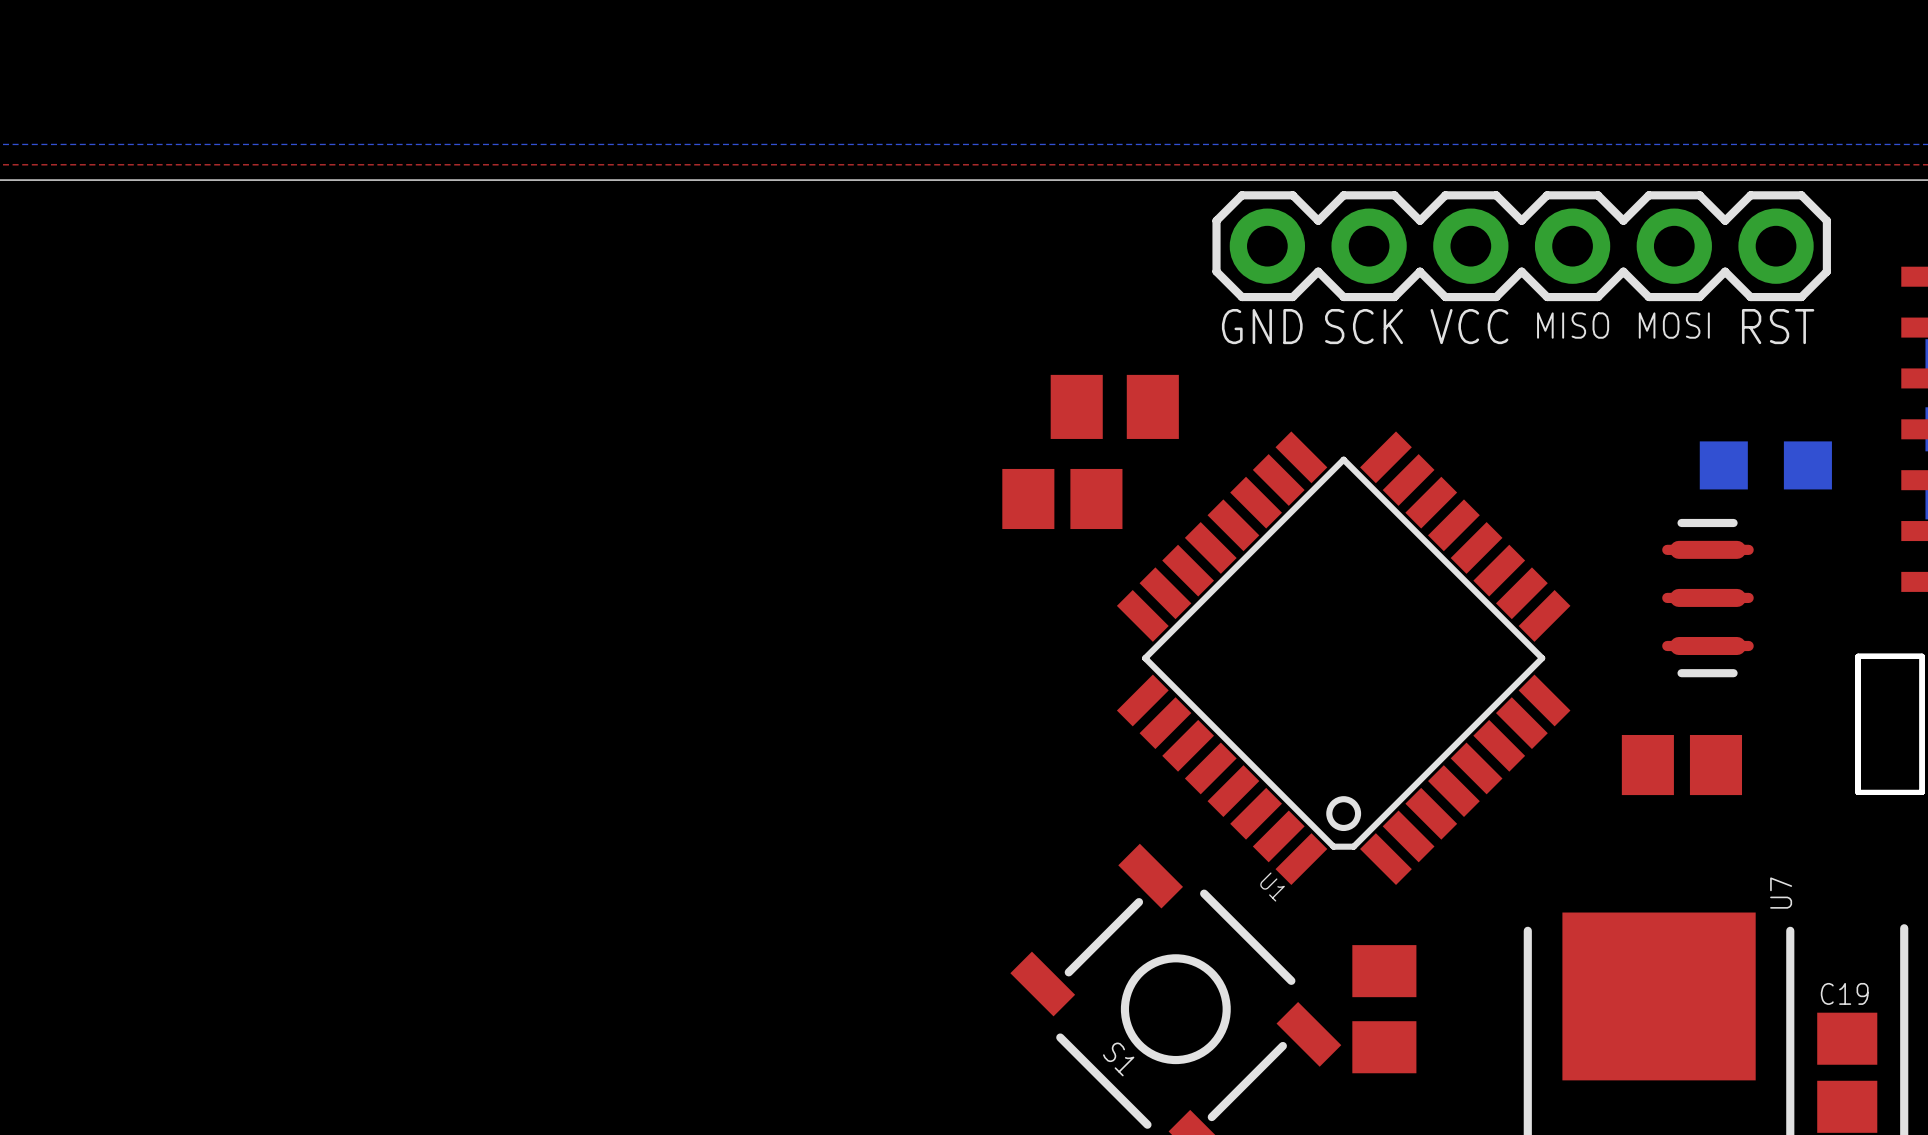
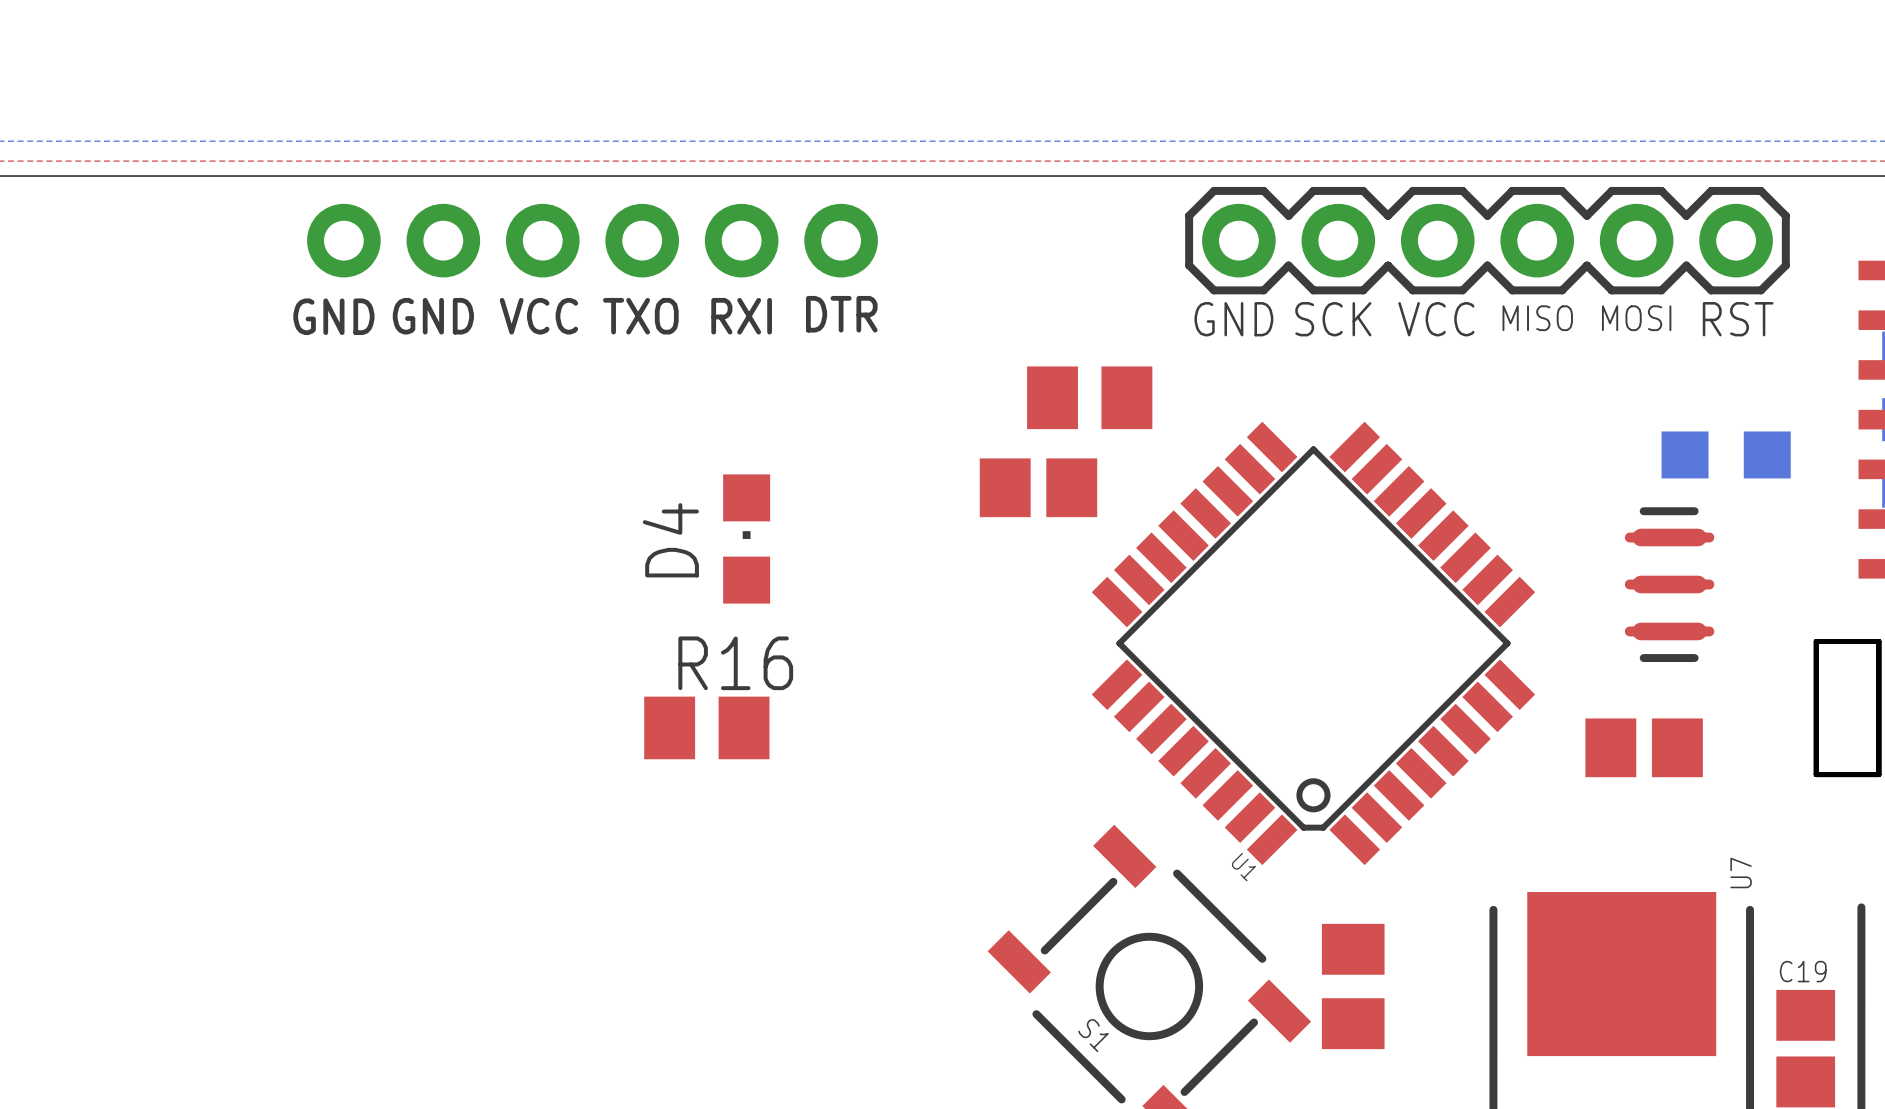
part: none -> (592, 240)
text: none -> DTR (841, 314)
text: none -> GND (433, 316)
text: none -> VCC (538, 316)
text: none -> TXO (640, 316)
text: none -> RXI (741, 316)
text: none -> GND (333, 316)
D4: none -> (746, 538)
R16: none -> (706, 727)

